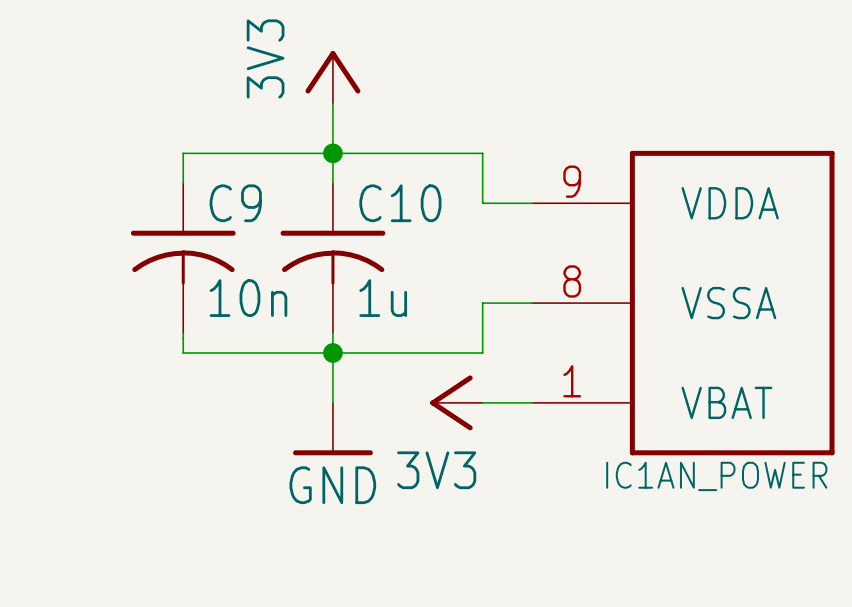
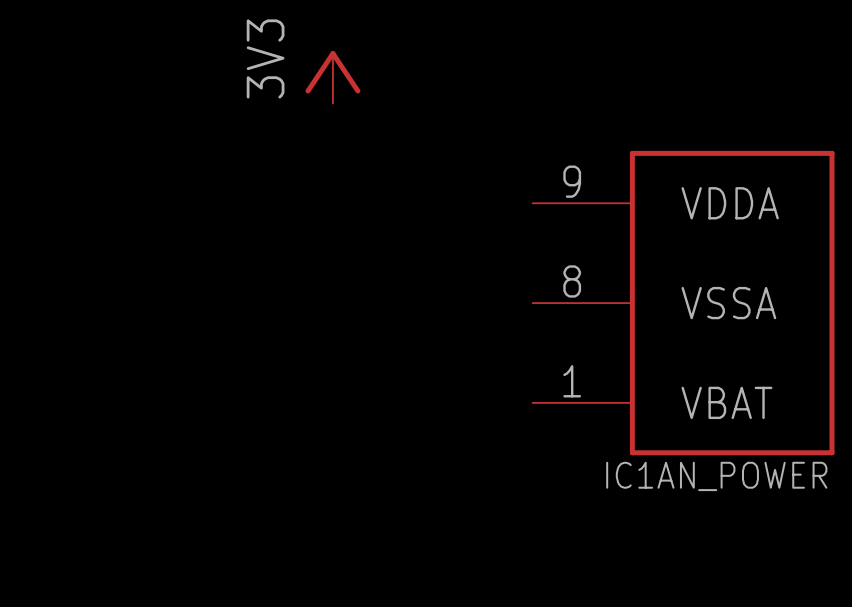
wire: (332, 103) (332, 183) -> none
junction: (332, 153) -> none
wire: (183, 183) (183, 153) (482, 153) (482, 203) (532, 203) -> none
C9: 10n (183, 258) -> none
C10: 1u (332, 258) -> none
wire: (532, 303) (482, 303) (482, 352) (183, 352) (183, 333) -> none
wire: (332, 333) (332, 402) -> none
junction: (332, 352) -> none
power symbol: 3V3 (456, 402) -> none
wire: (482, 402) (532, 402) -> none
power symbol: GND (332, 429) -> none

